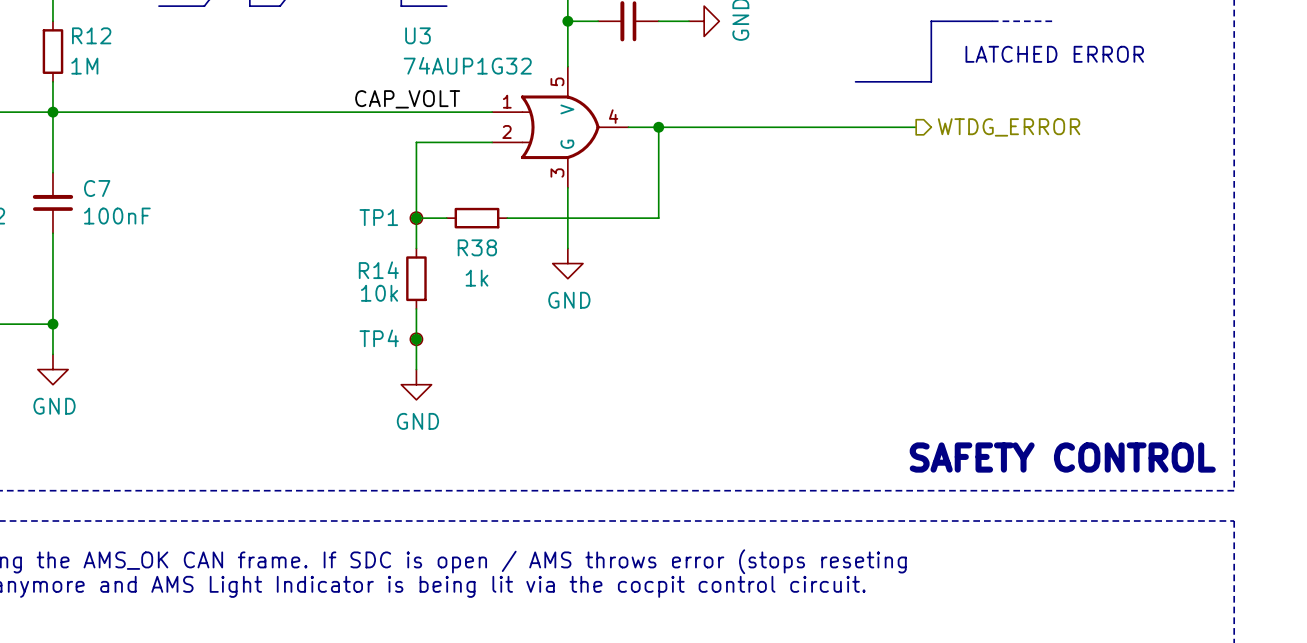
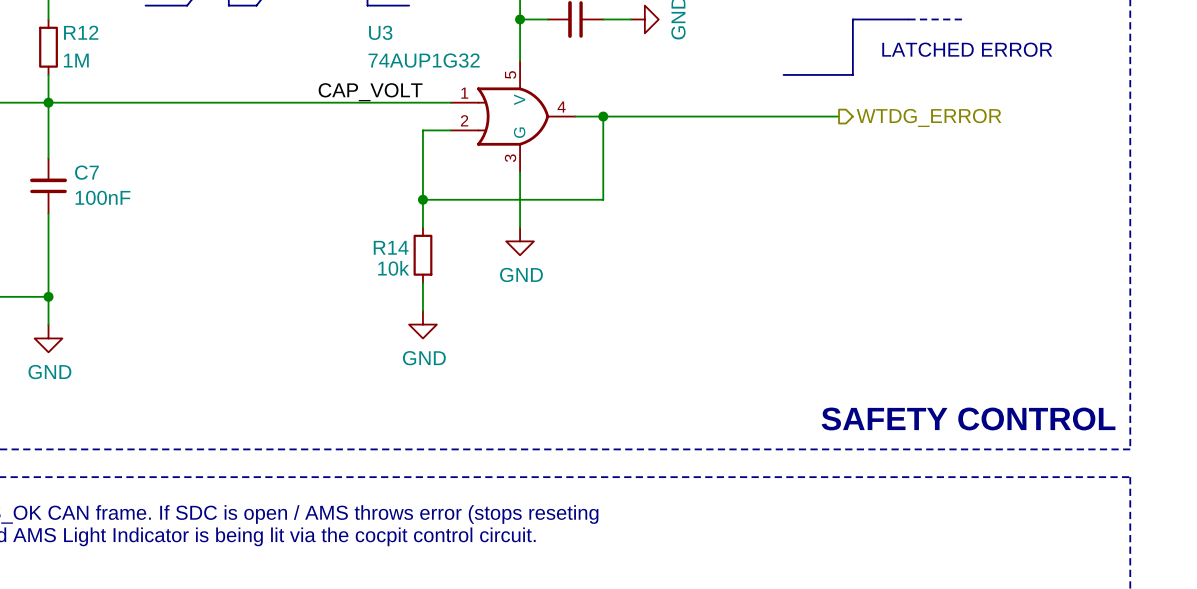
wire: (461, 142) (416, 142) (416, 248) -> (422, 130) (422, 227)
wire: (416, 218) (446, 218) -> none
junction position: (416, 218) -> (422, 199)
TP1: (416, 218) -> none
wire: none -> (422, 199) (464, 199)
R38: 1k (477, 218) -> none
R14 position: (416, 278) -> (422, 255)
wire: (416, 308) (416, 369) -> none
wire: none -> (422, 282) (422, 310)
junction: (416, 339) -> none
TP4: (416, 339) -> none
power symbol position: GND (416, 384) -> GND (422, 324)

